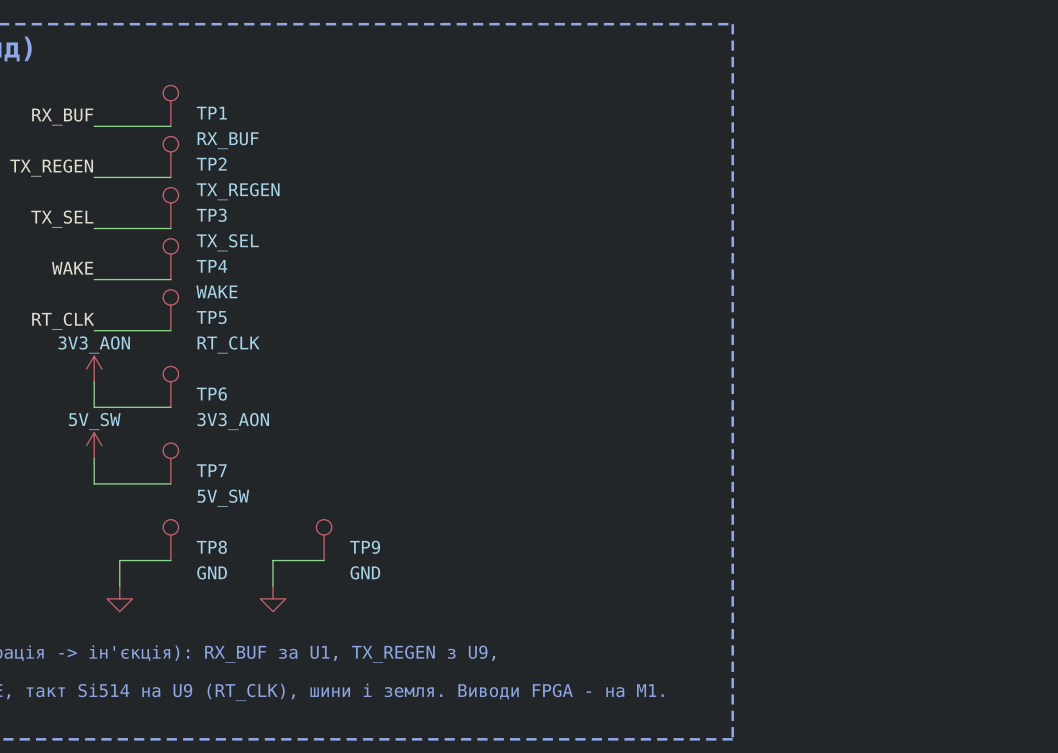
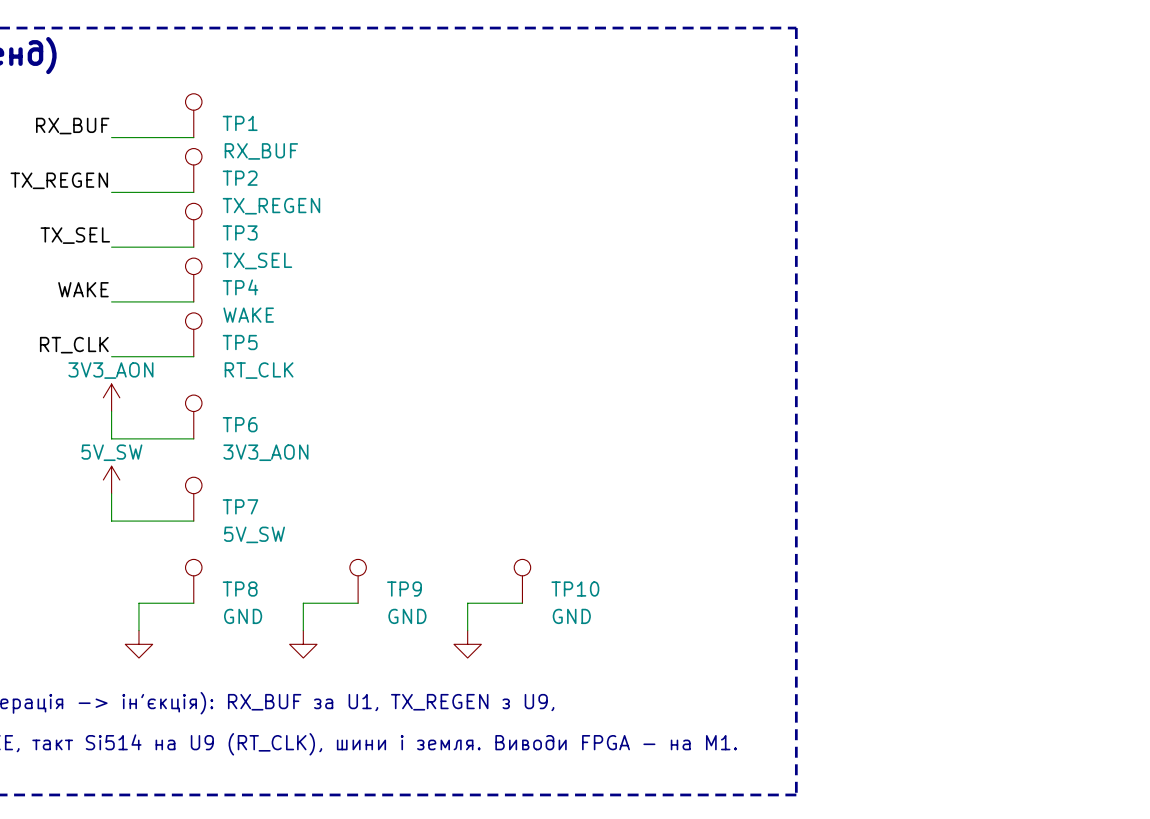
TP10: none -> GND (522, 581)
wire: none -> (522, 603) (467, 603) (467, 630)
power symbol: none -> (467, 644)

